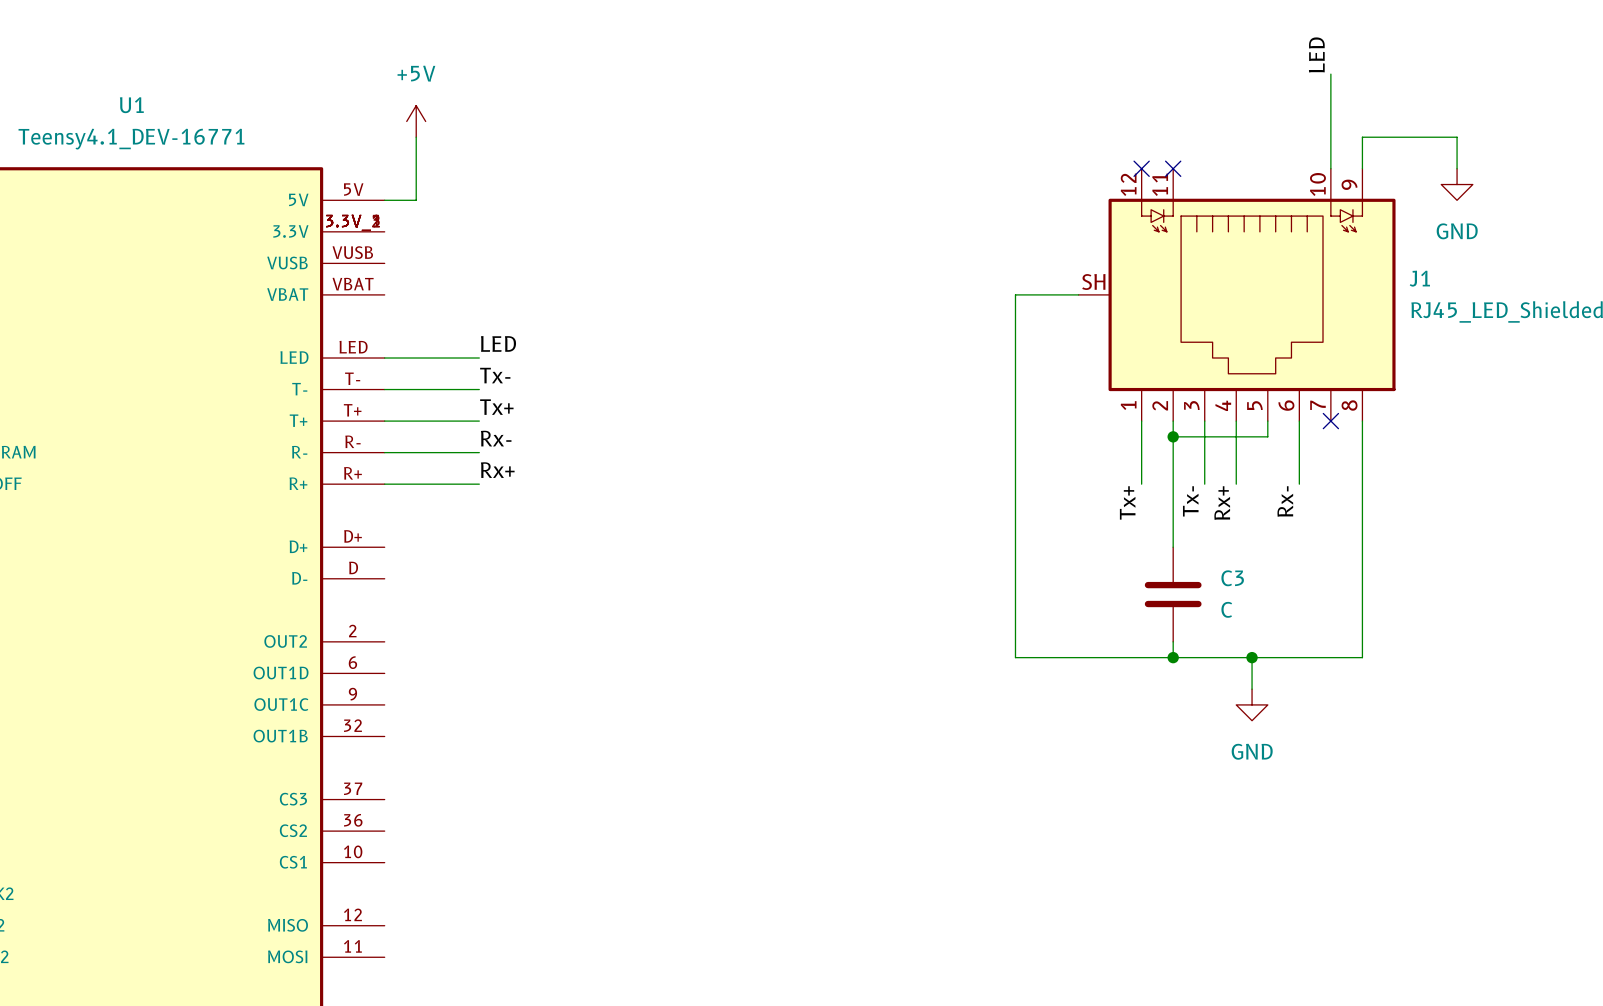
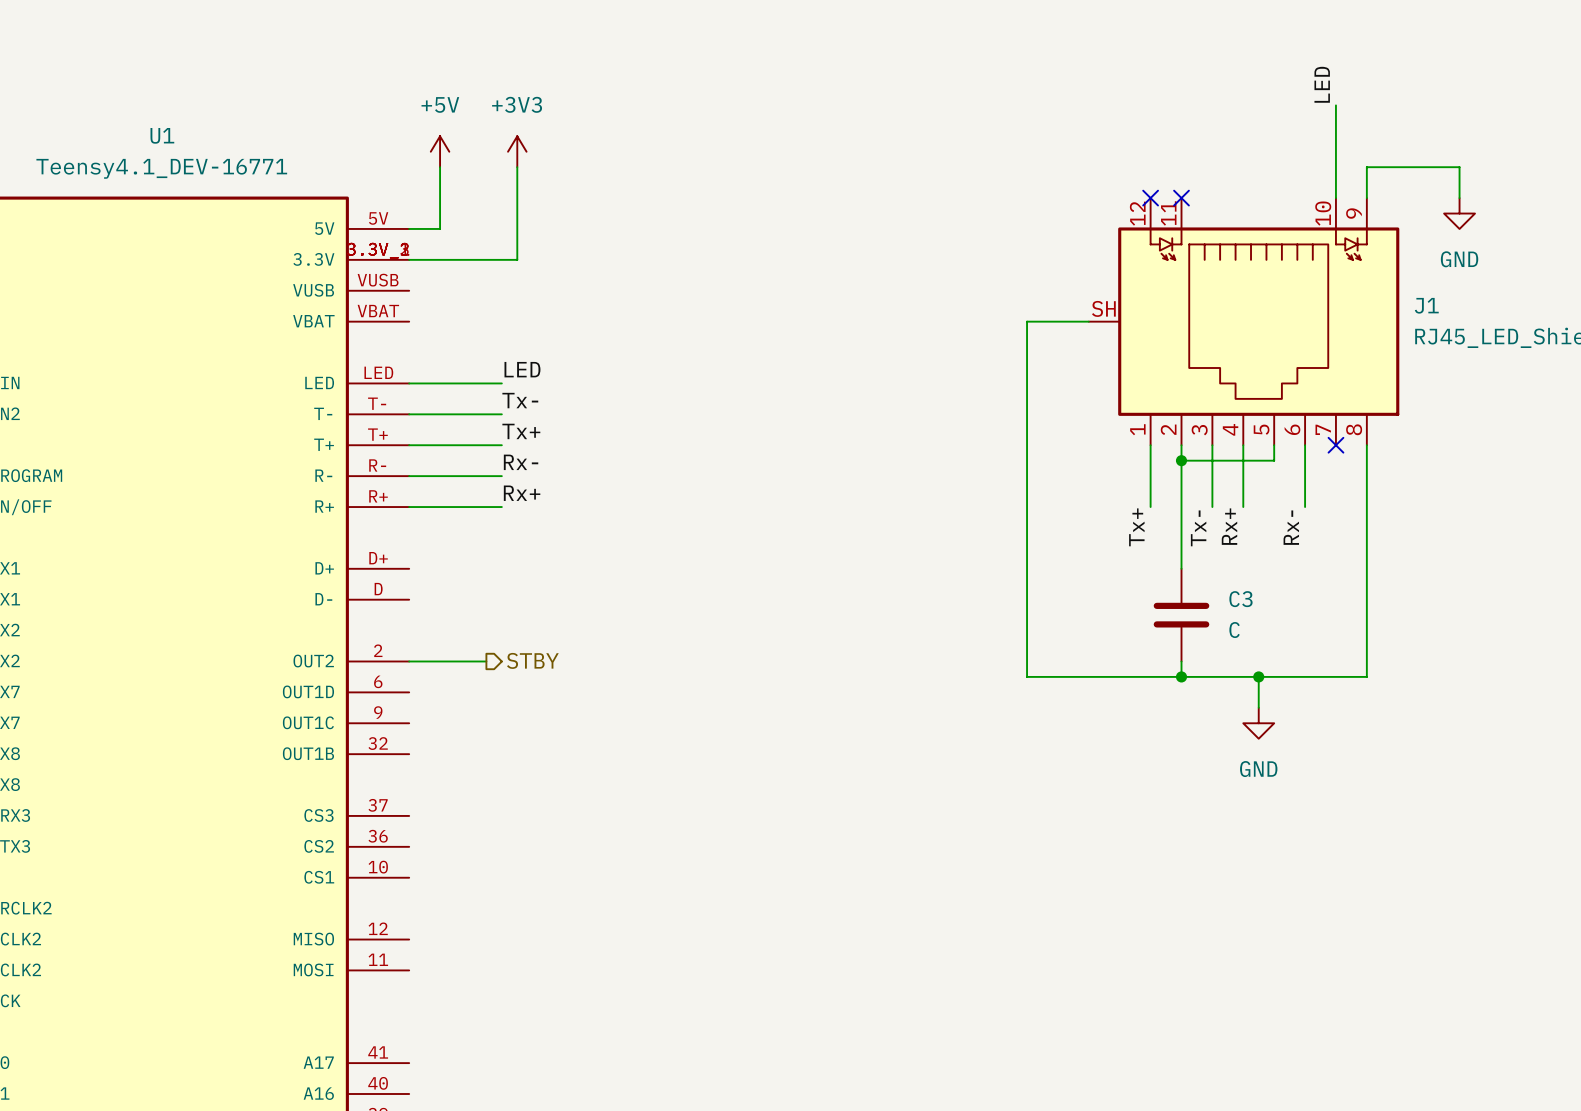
power symbol: none -> +3V3 (517, 151)
wire: none -> (517, 167) (517, 259) (409, 259)
wire: none -> (409, 661) (486, 661)
hierarchical label: none -> STBY (532, 660)

